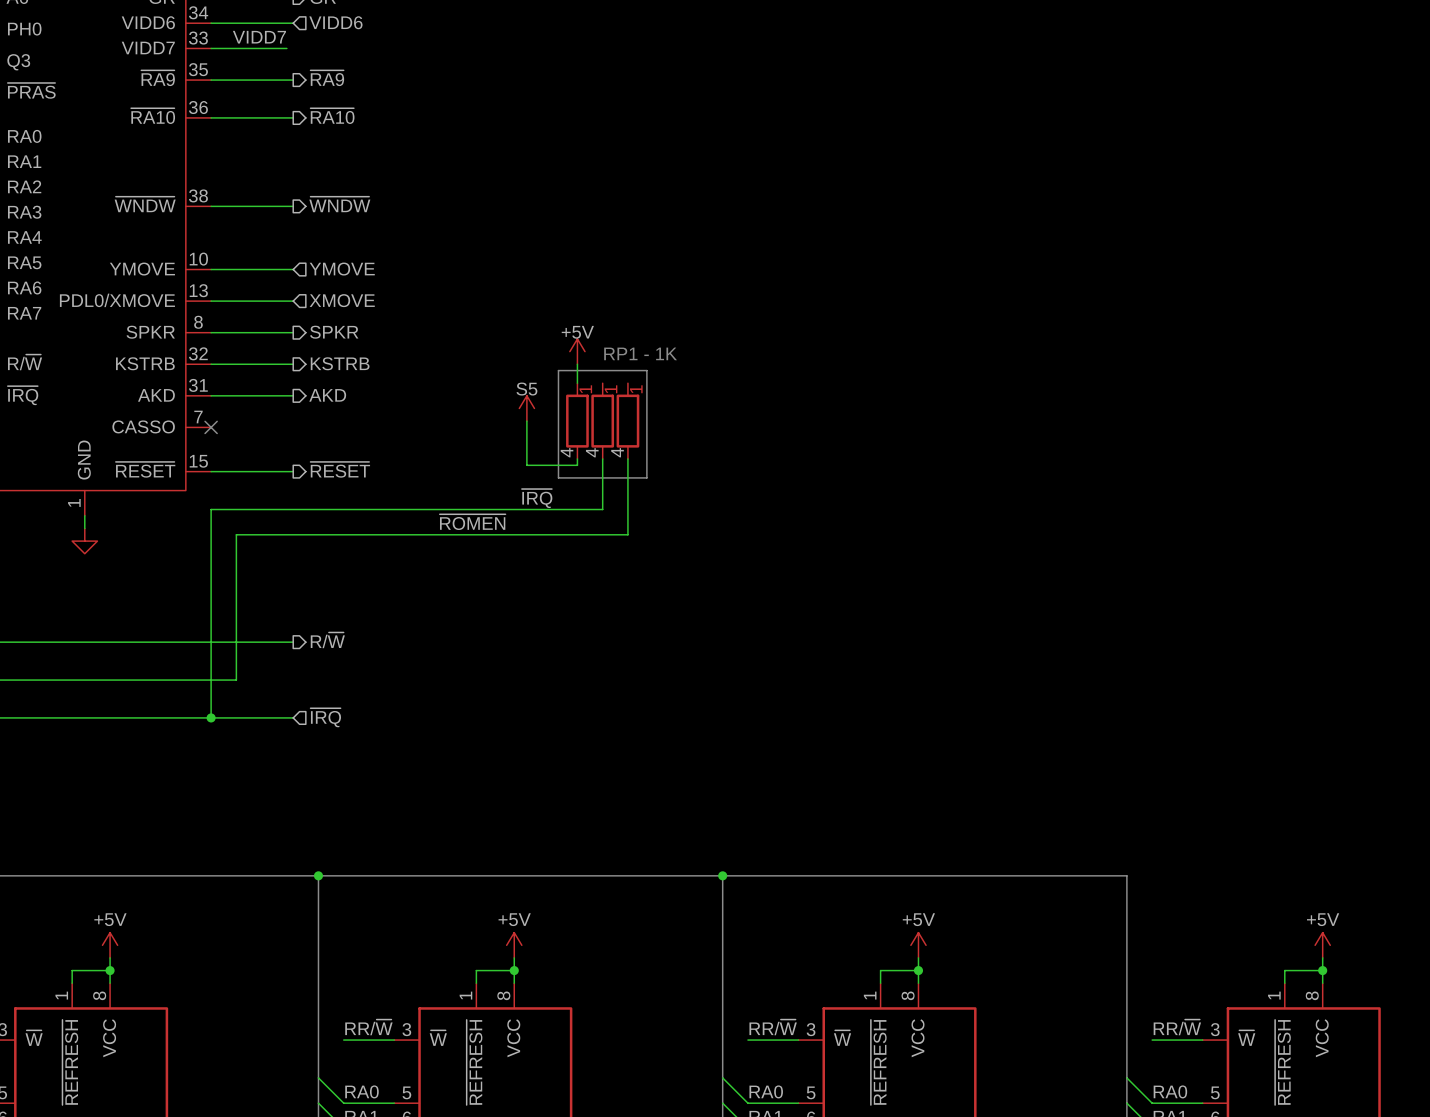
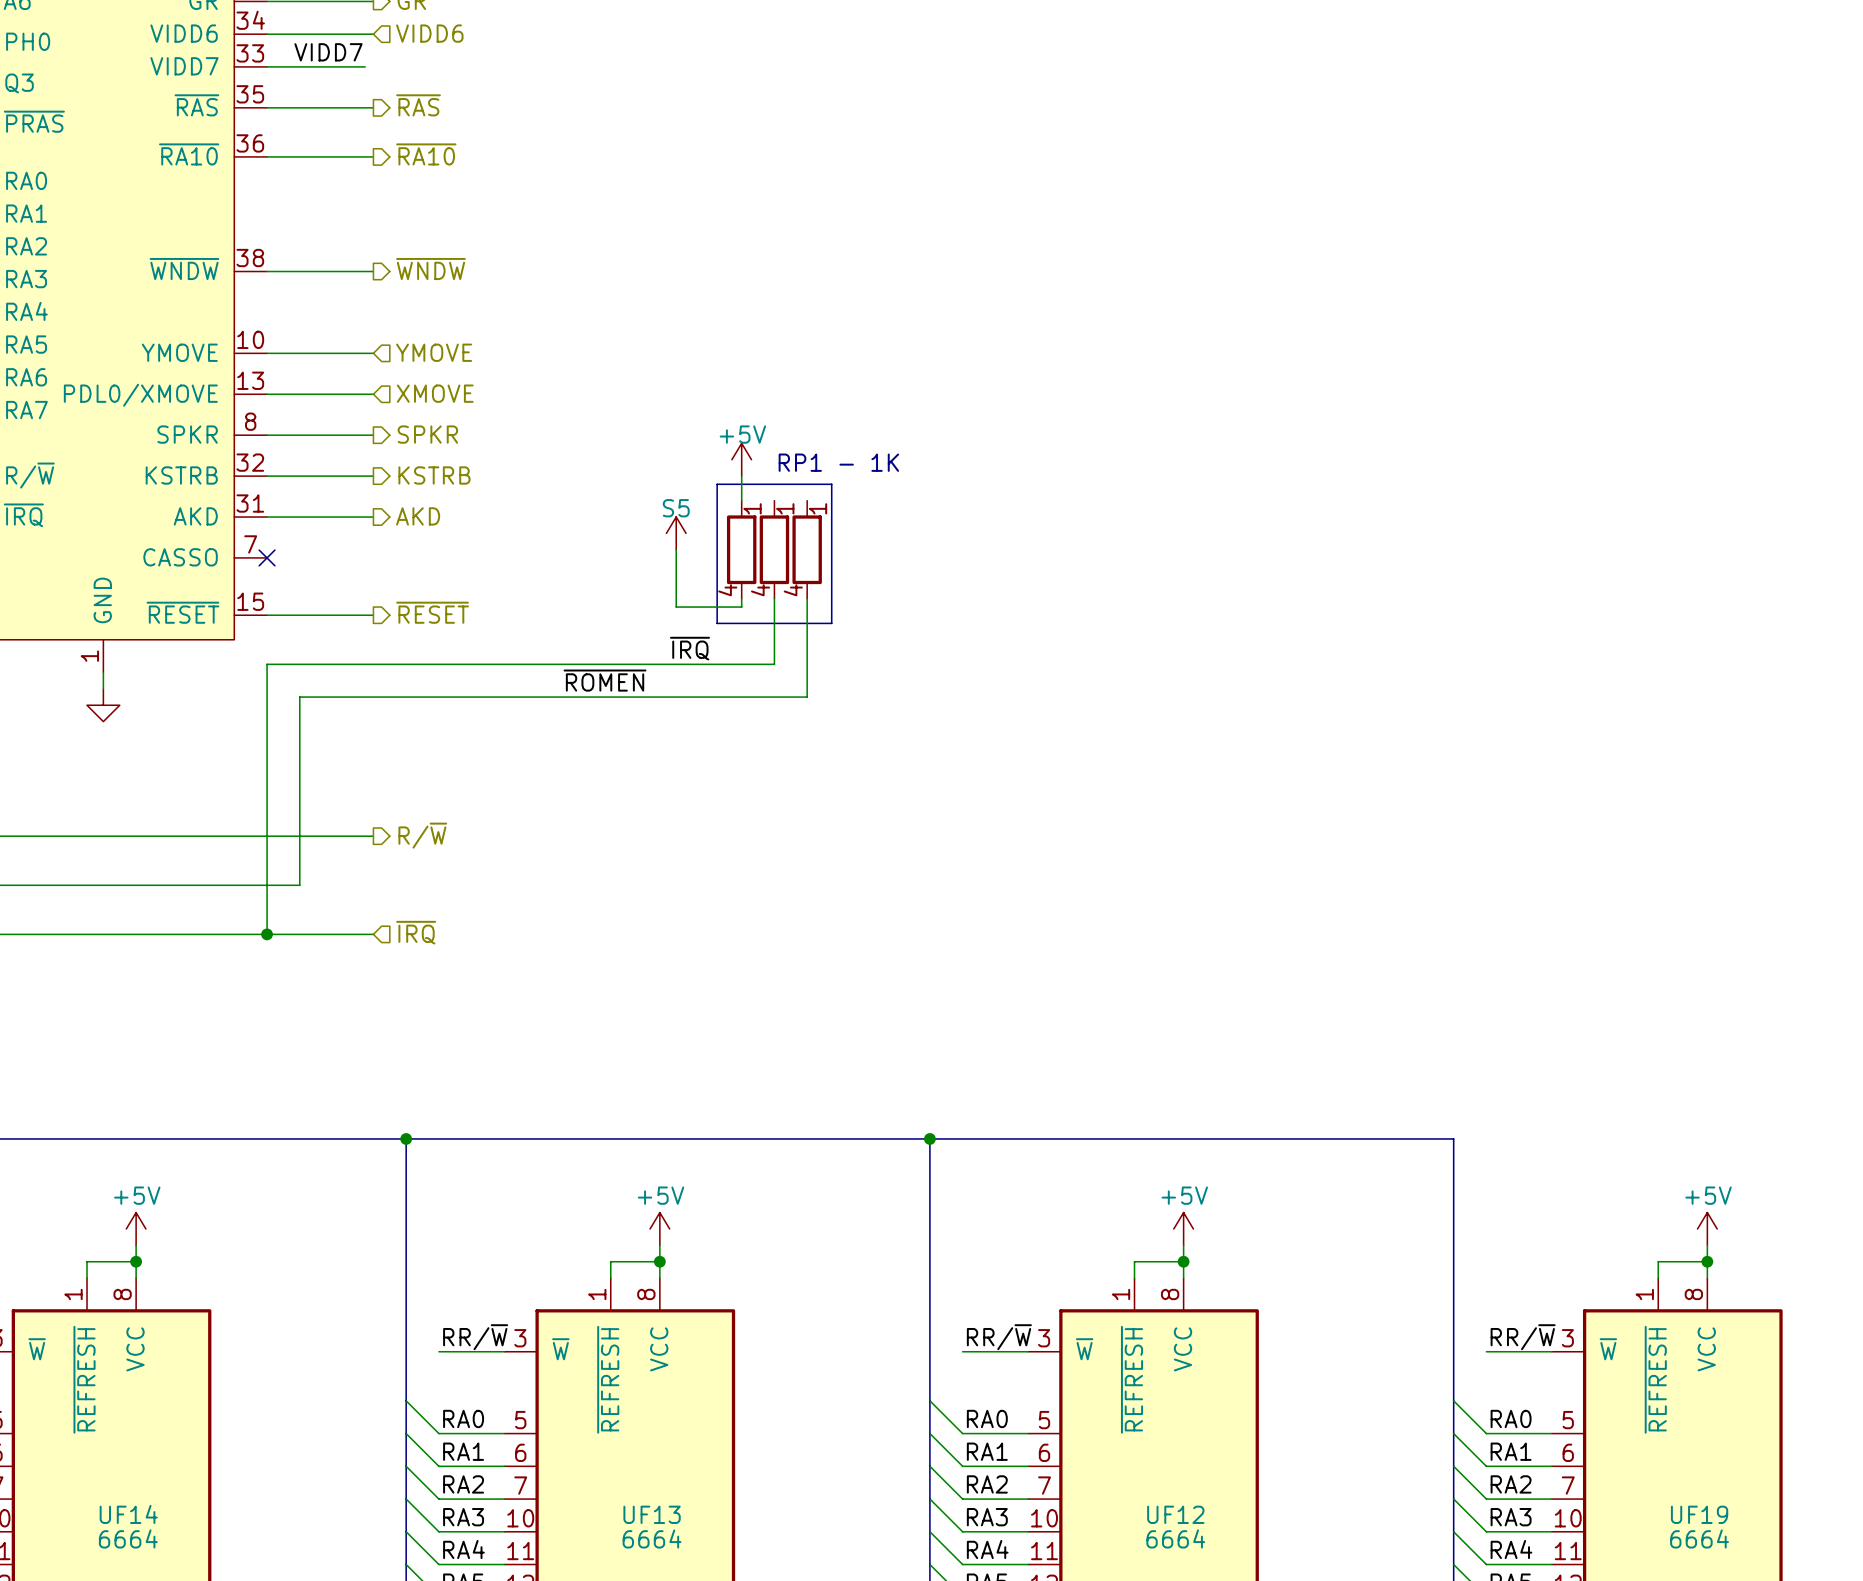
part pin name: ~{RA9} (158, 78) -> ~{RAS} (196, 105)
hierarchical label: ~{RA9} (327, 78) -> ~{RAS} (418, 105)

